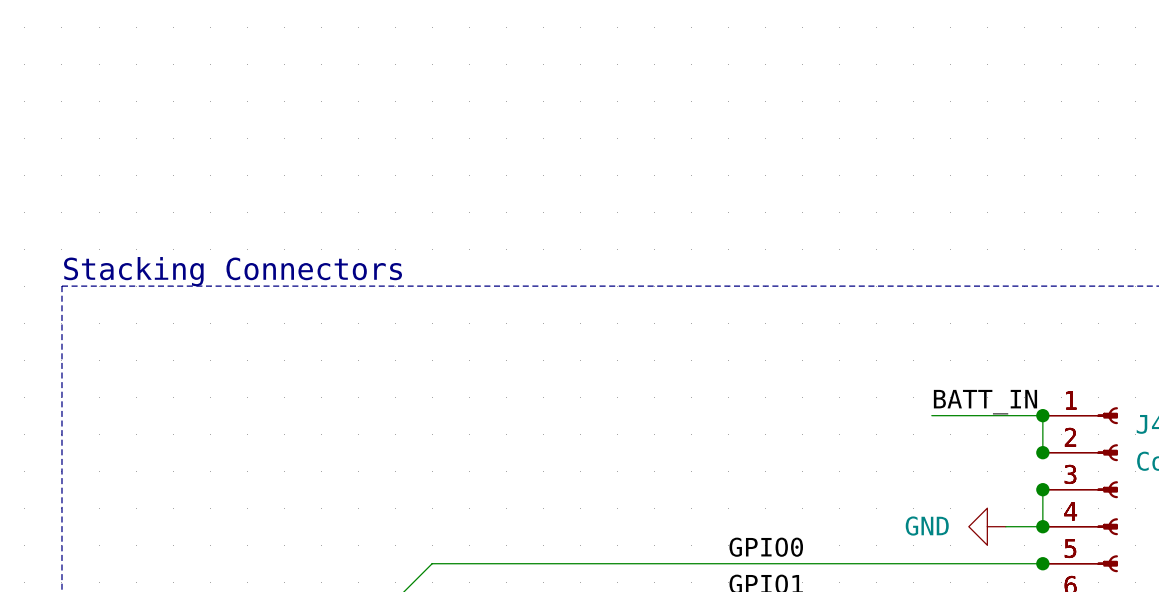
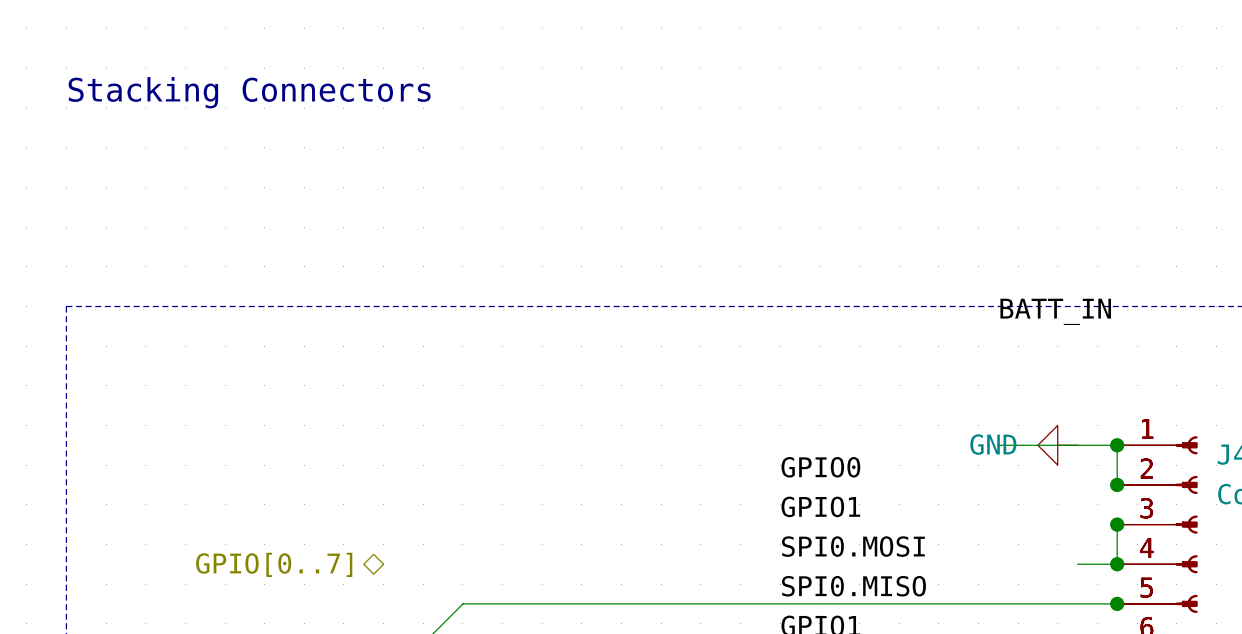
text position: Stacking Connectors (233, 271) -> Stacking Connectors (249, 92)
label position: BATT_IN (985, 402) -> BATT_IN (1055, 311)
label: none -> GPIO0 (820, 467)
label: none -> GPIO1 (820, 506)
label: none -> SPI0.MOSI (853, 546)
power symbol position: GND (987, 526) -> GND (1057, 445)
hierarchical label: none -> GPIO[0..7] (274, 564)
label: GPIO0 (766, 547) -> SPI0.MISO (853, 586)

